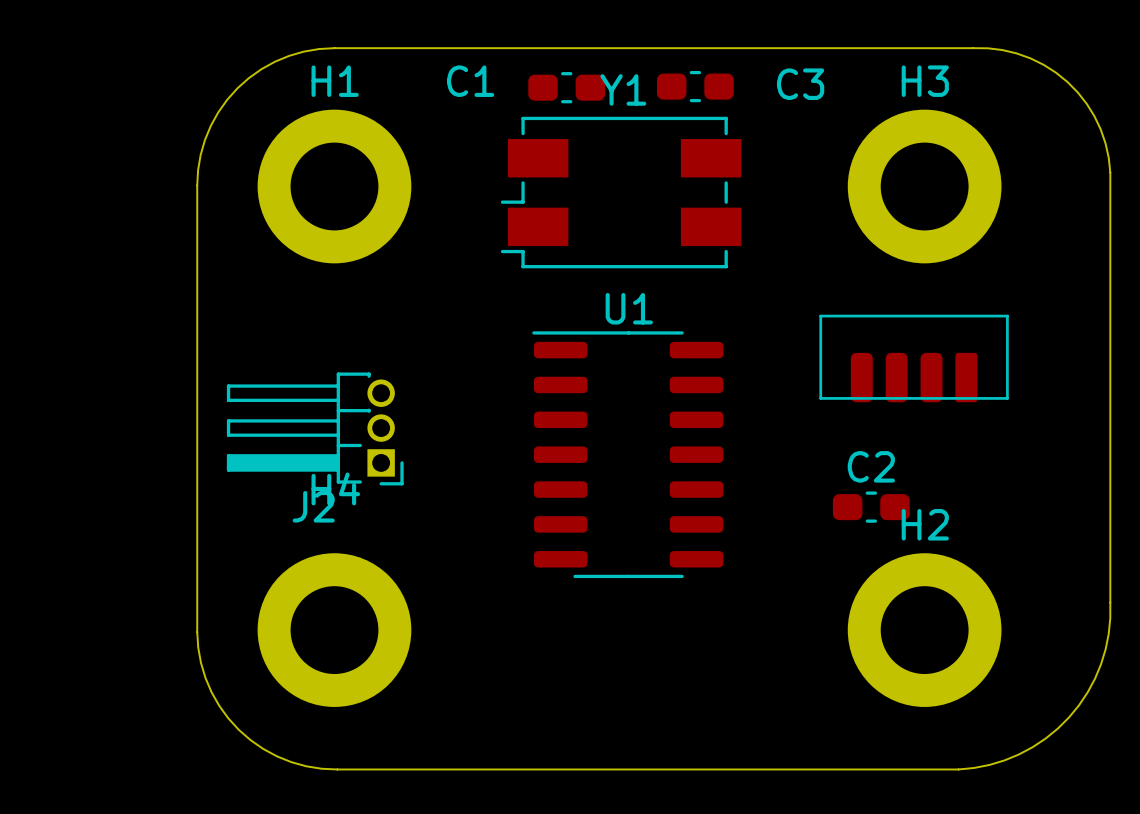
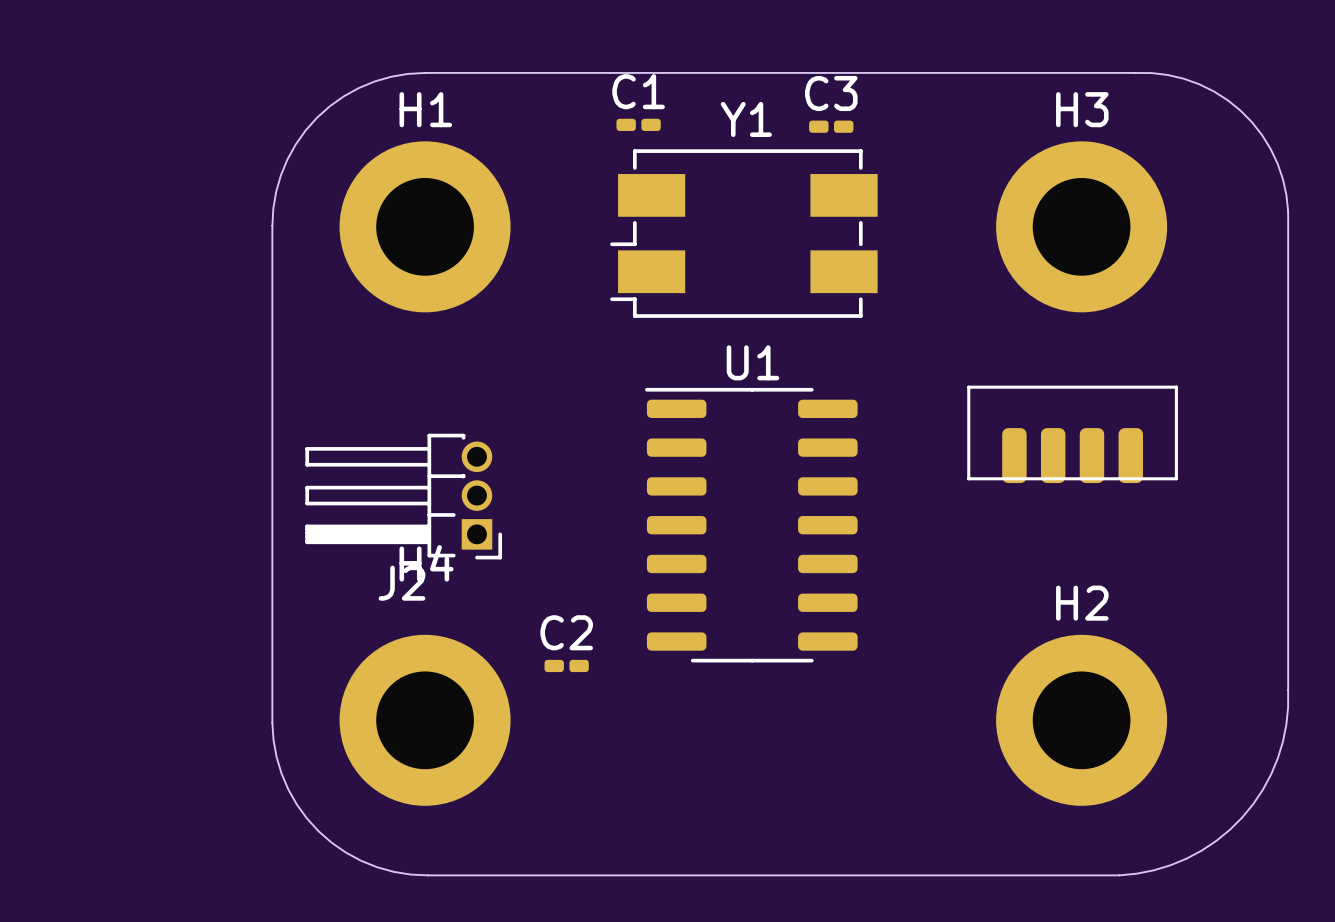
C3 footprint: [656, 70, 734, 103] -> [809, 120, 854, 133]
C1 footprint: [528, 72, 606, 104] -> [616, 118, 661, 131]
C1 name position: C1 (470, 81) -> C1 (638, 91)
C3 name position: C3 (800, 84) -> C3 (831, 93)
part footprint: [819, 314, 1009, 403] -> [967, 385, 1178, 484]
C2 footprint: [832, 491, 910, 523] -> [544, 659, 589, 673]

